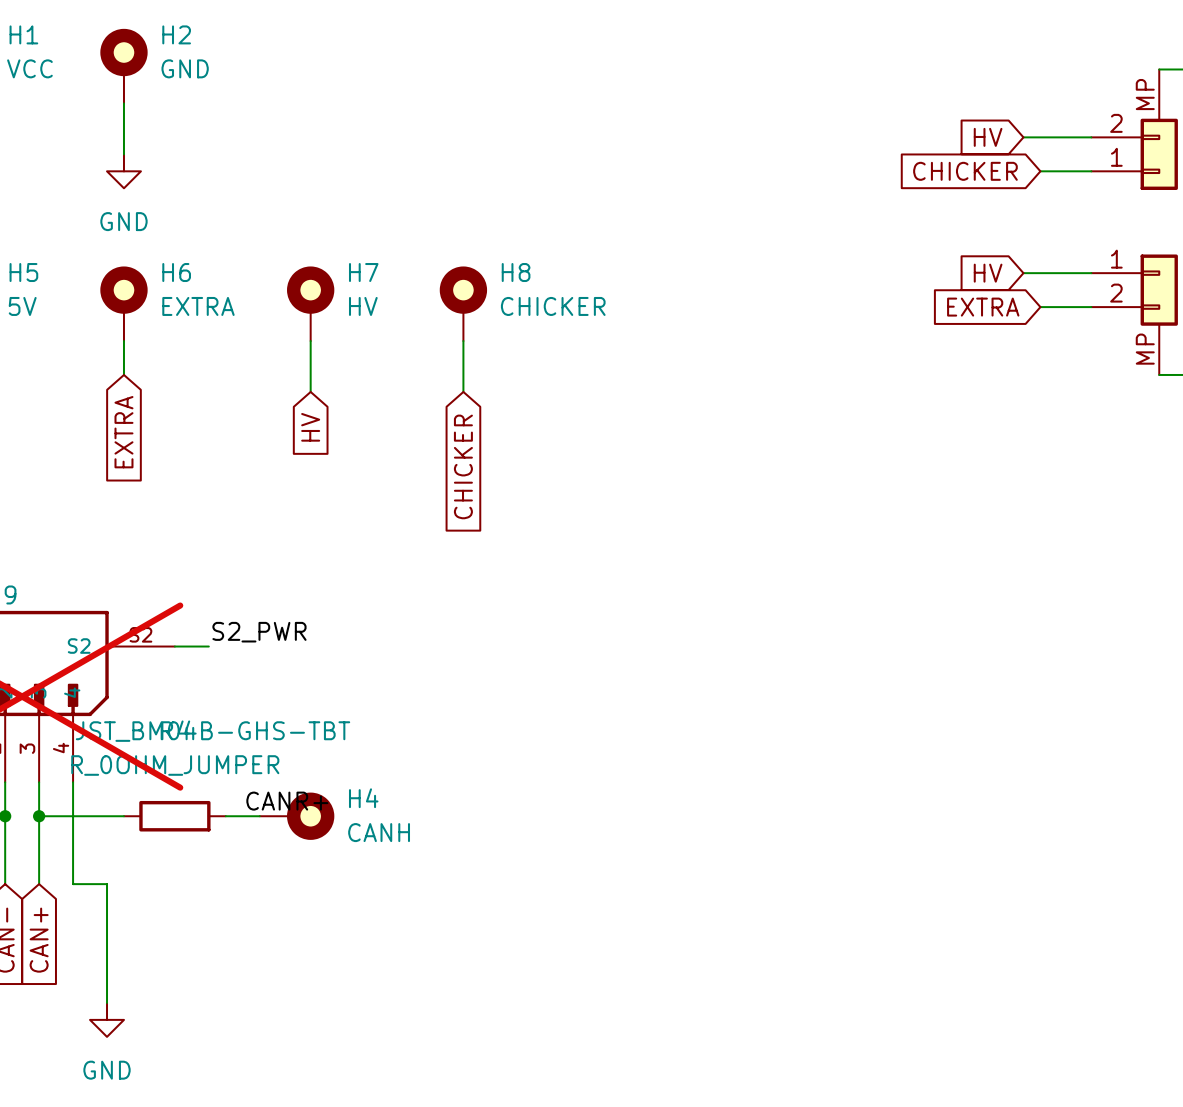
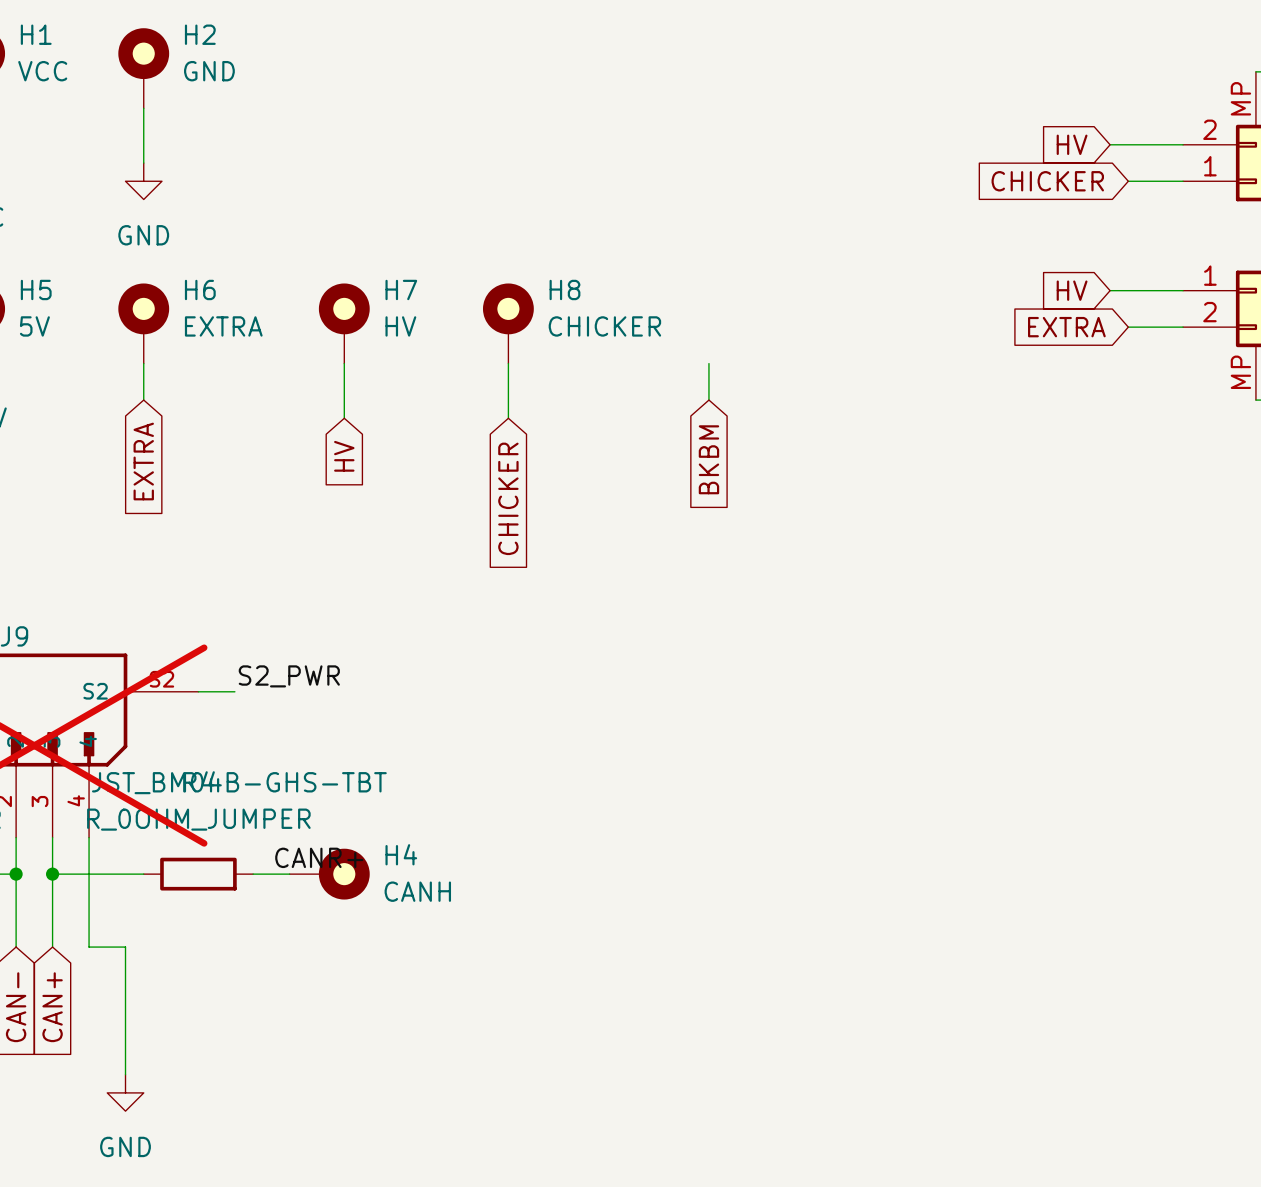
wire: none -> (708, 363) (708, 400)
global label: none -> BKBM (708, 459)

